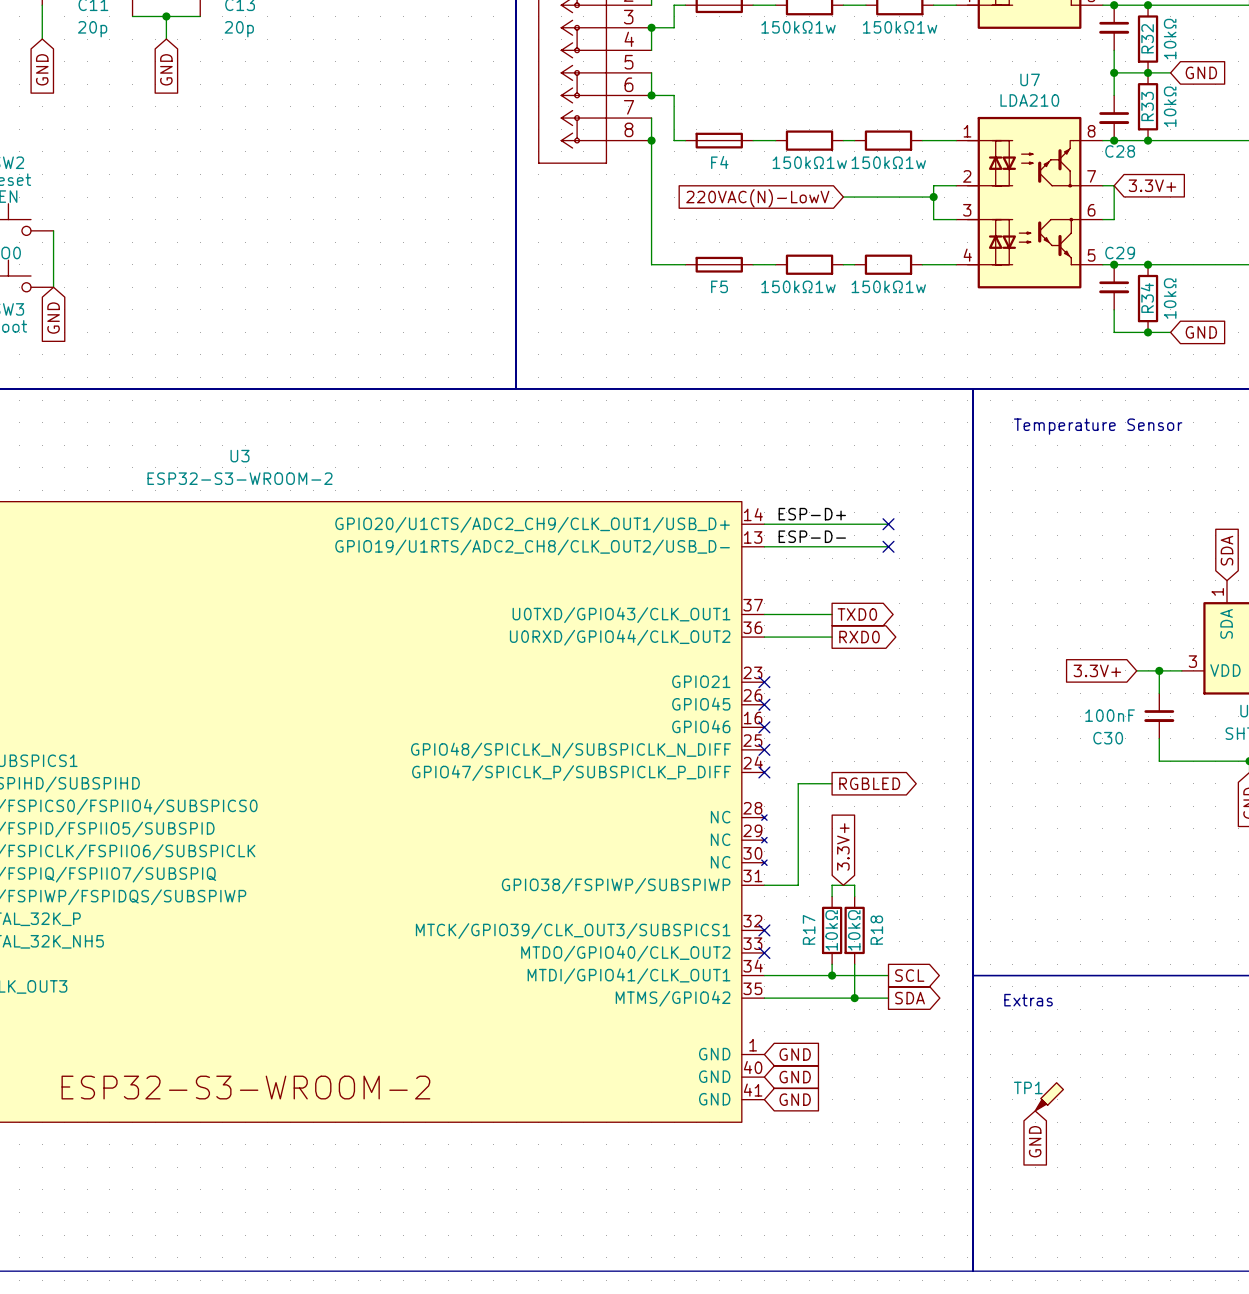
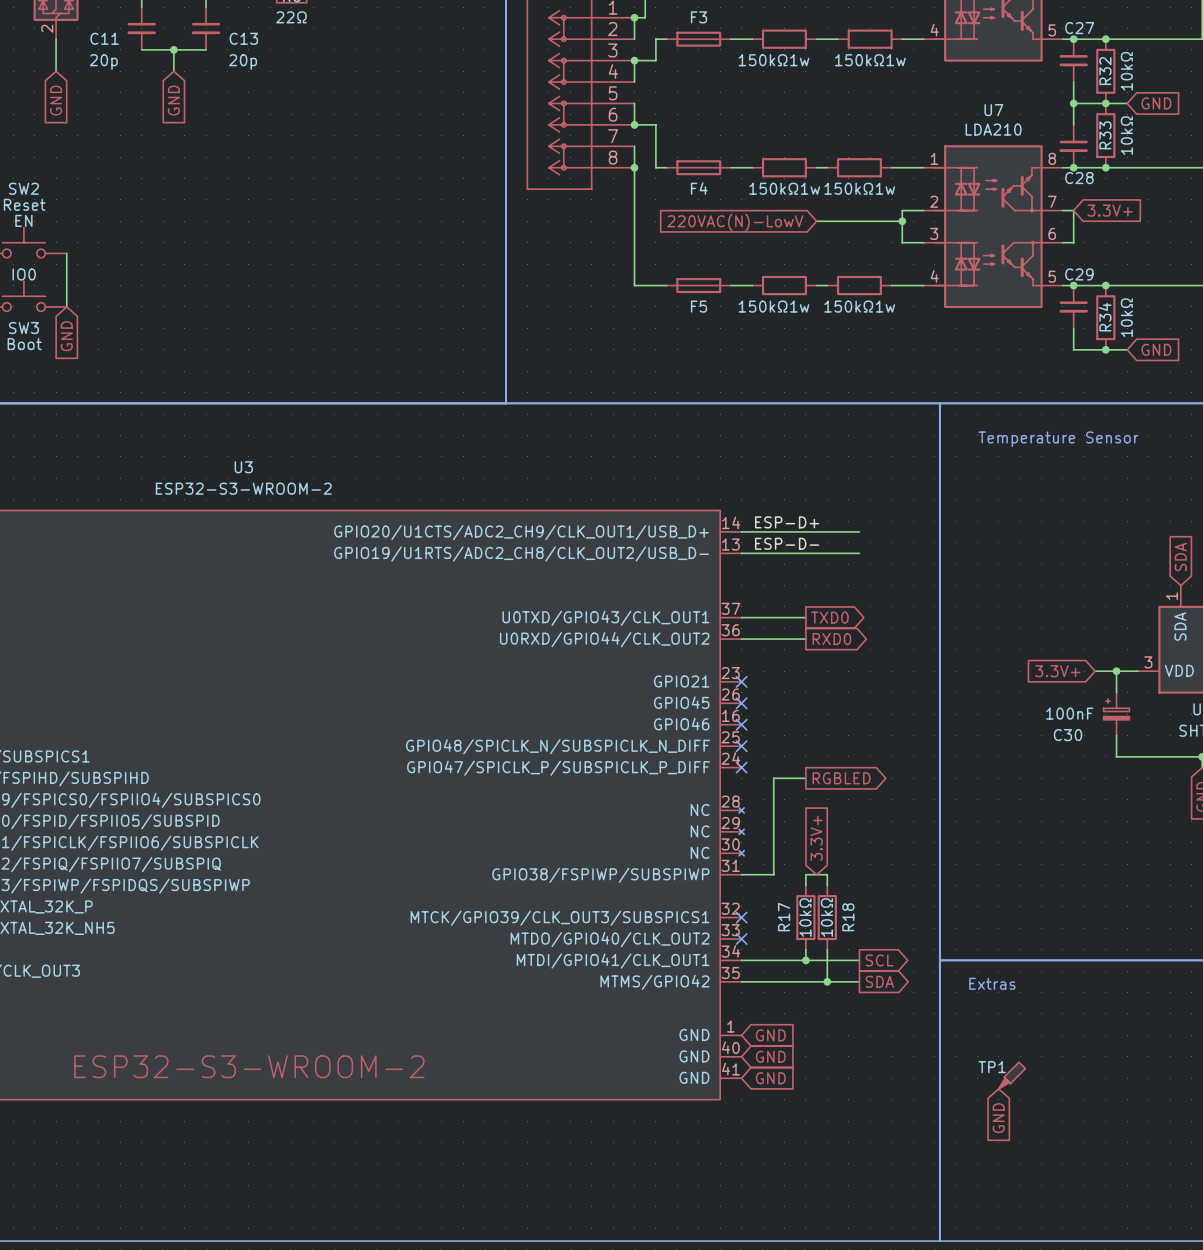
no-connect mark: (888, 524) -> none
no-connect mark: (888, 546) -> none
C30 symbol: [1144, 693, 1175, 739] -> [1103, 692, 1130, 736]

